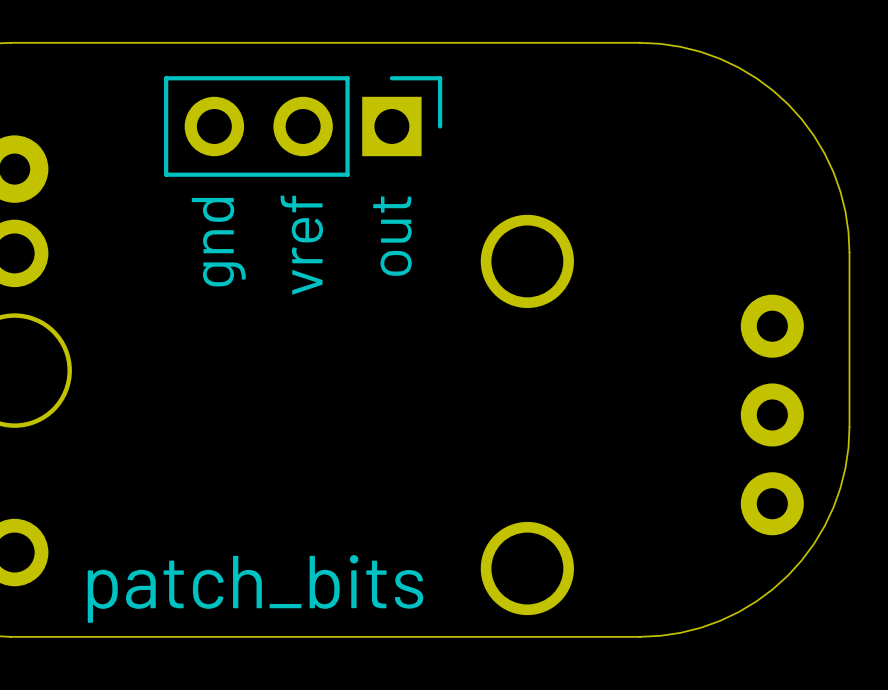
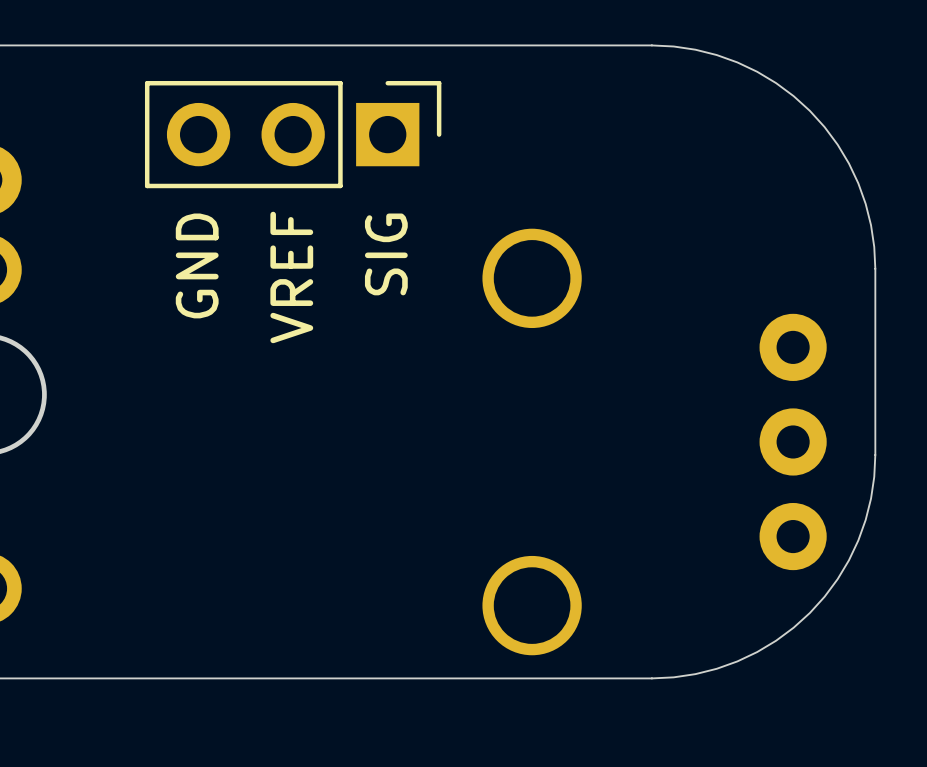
text: out (392, 236) -> SIG (386, 254)
text: gnd (218, 242) -> GND (197, 265)
text: vref (301, 245) -> VREF (291, 277)
text: patch_bits (255, 588) -> none

